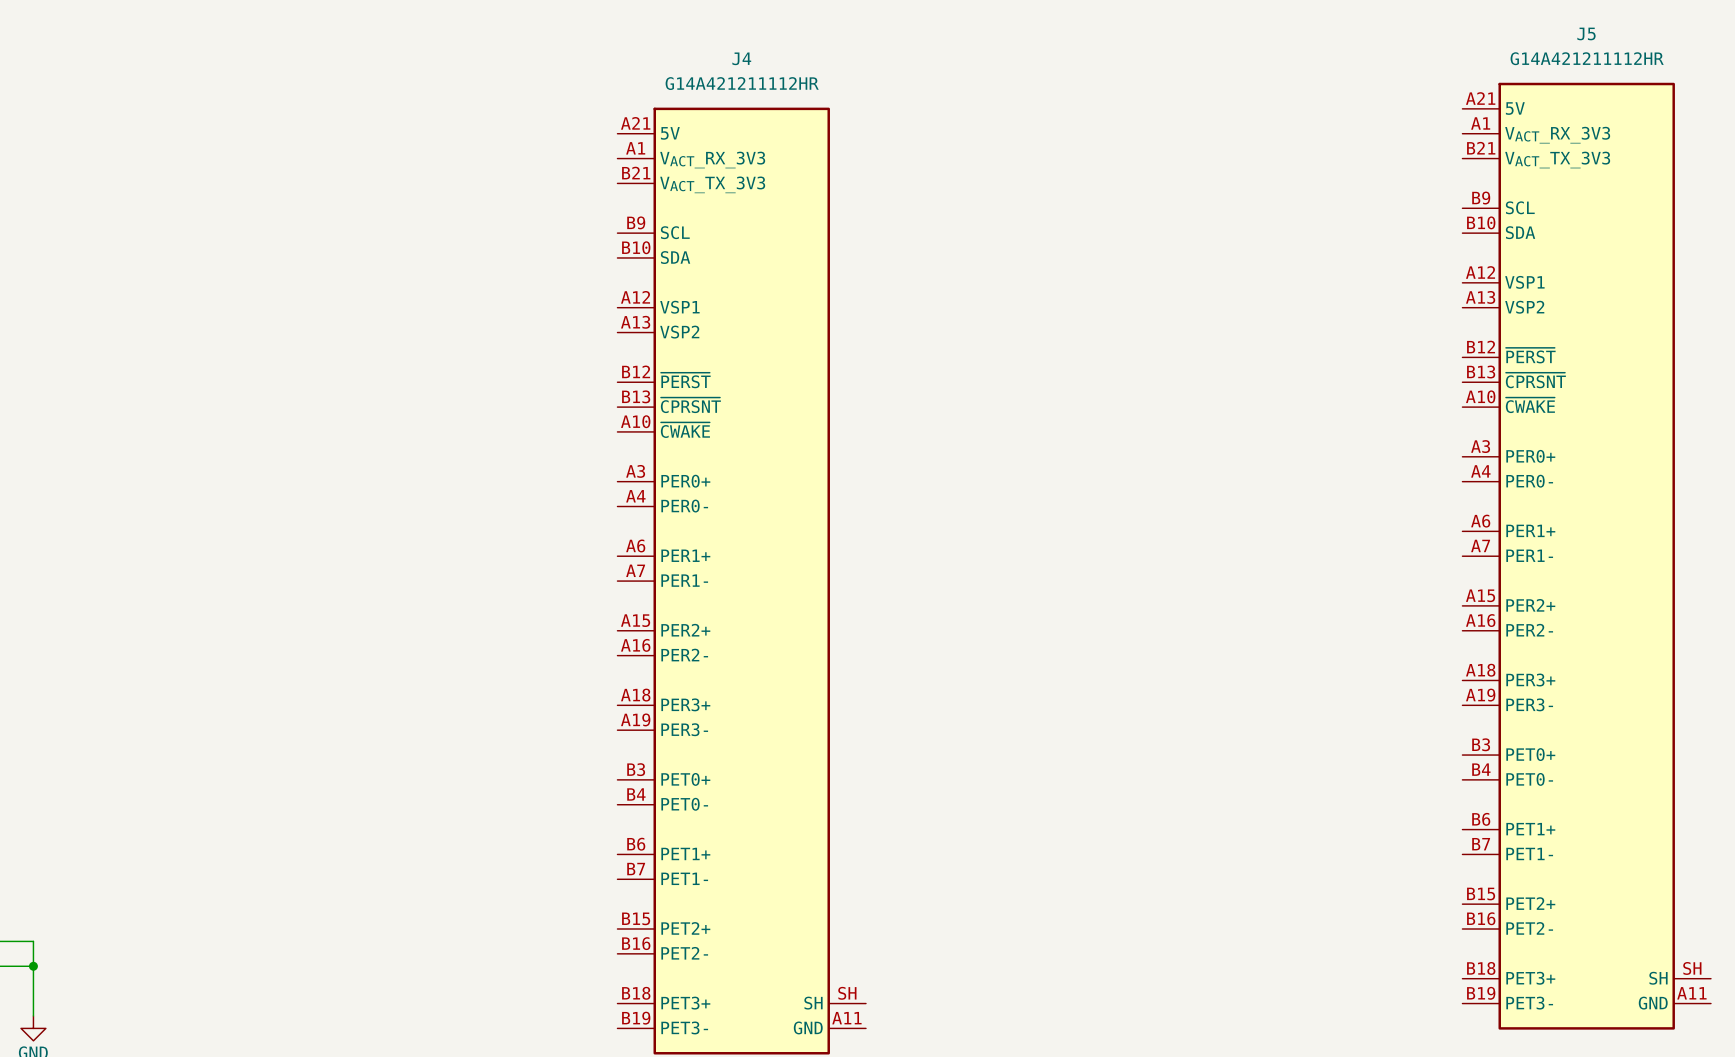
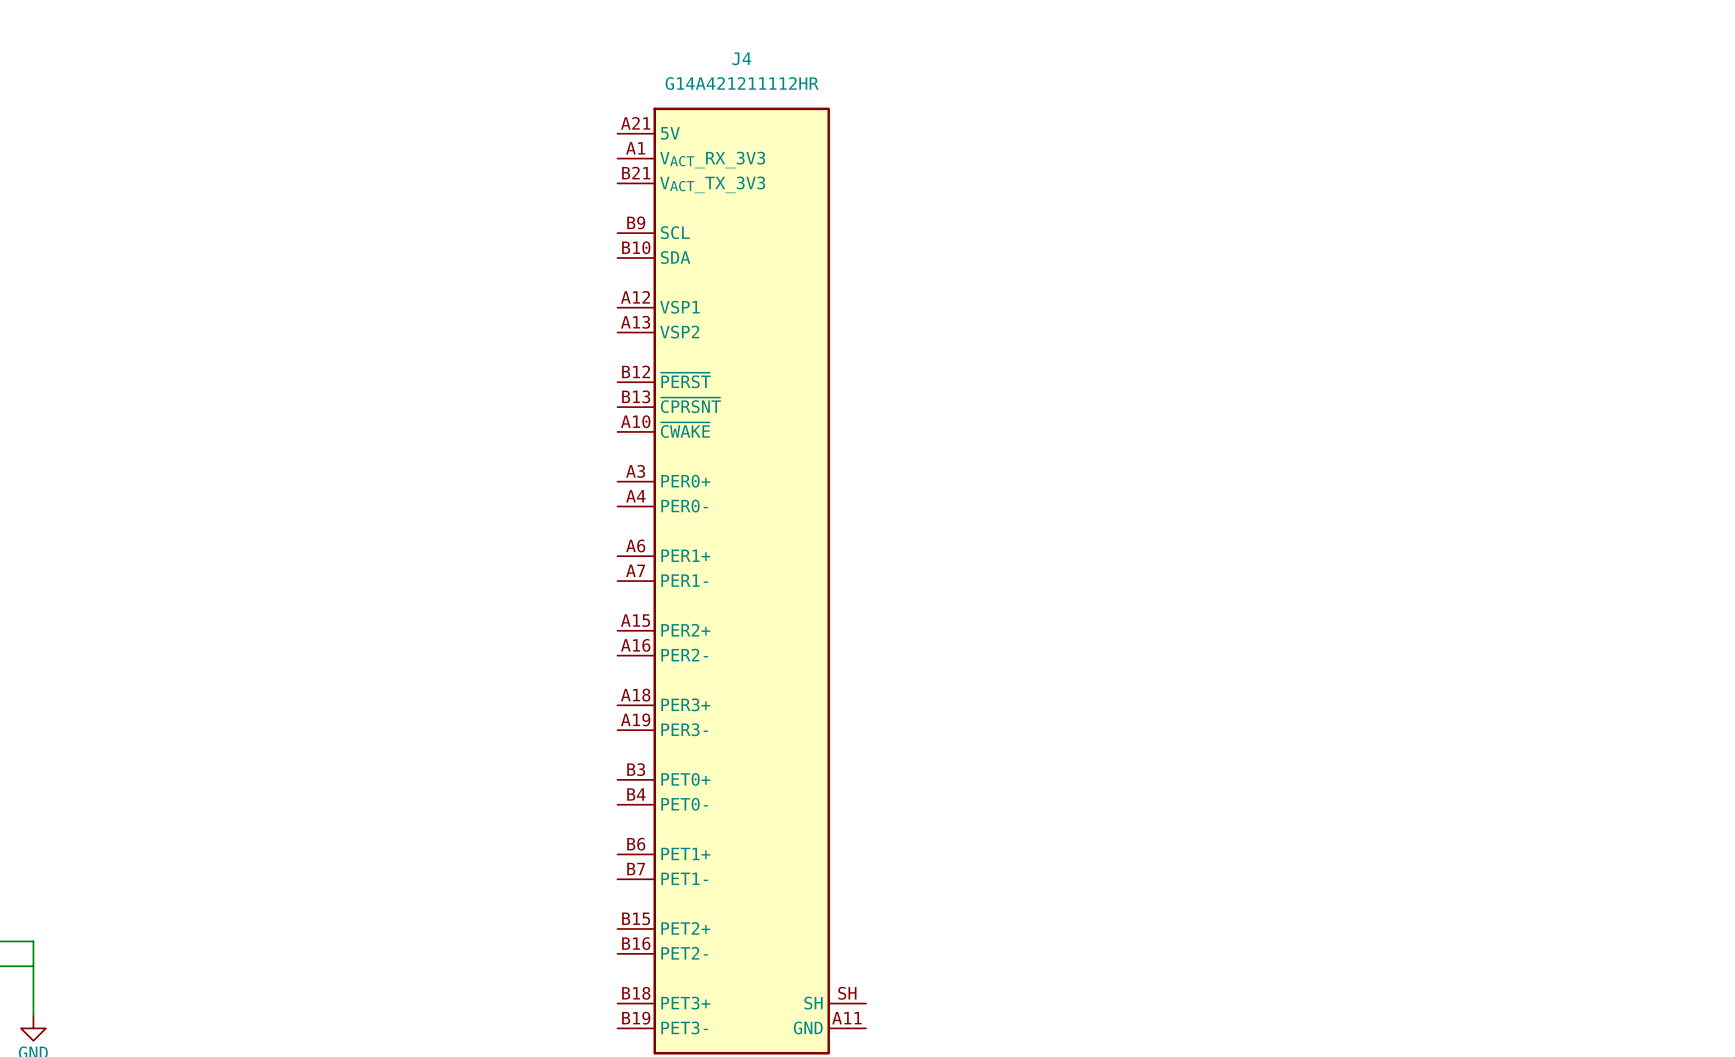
J5: (1586, 556) -> none
junction: (33, 966) -> none

